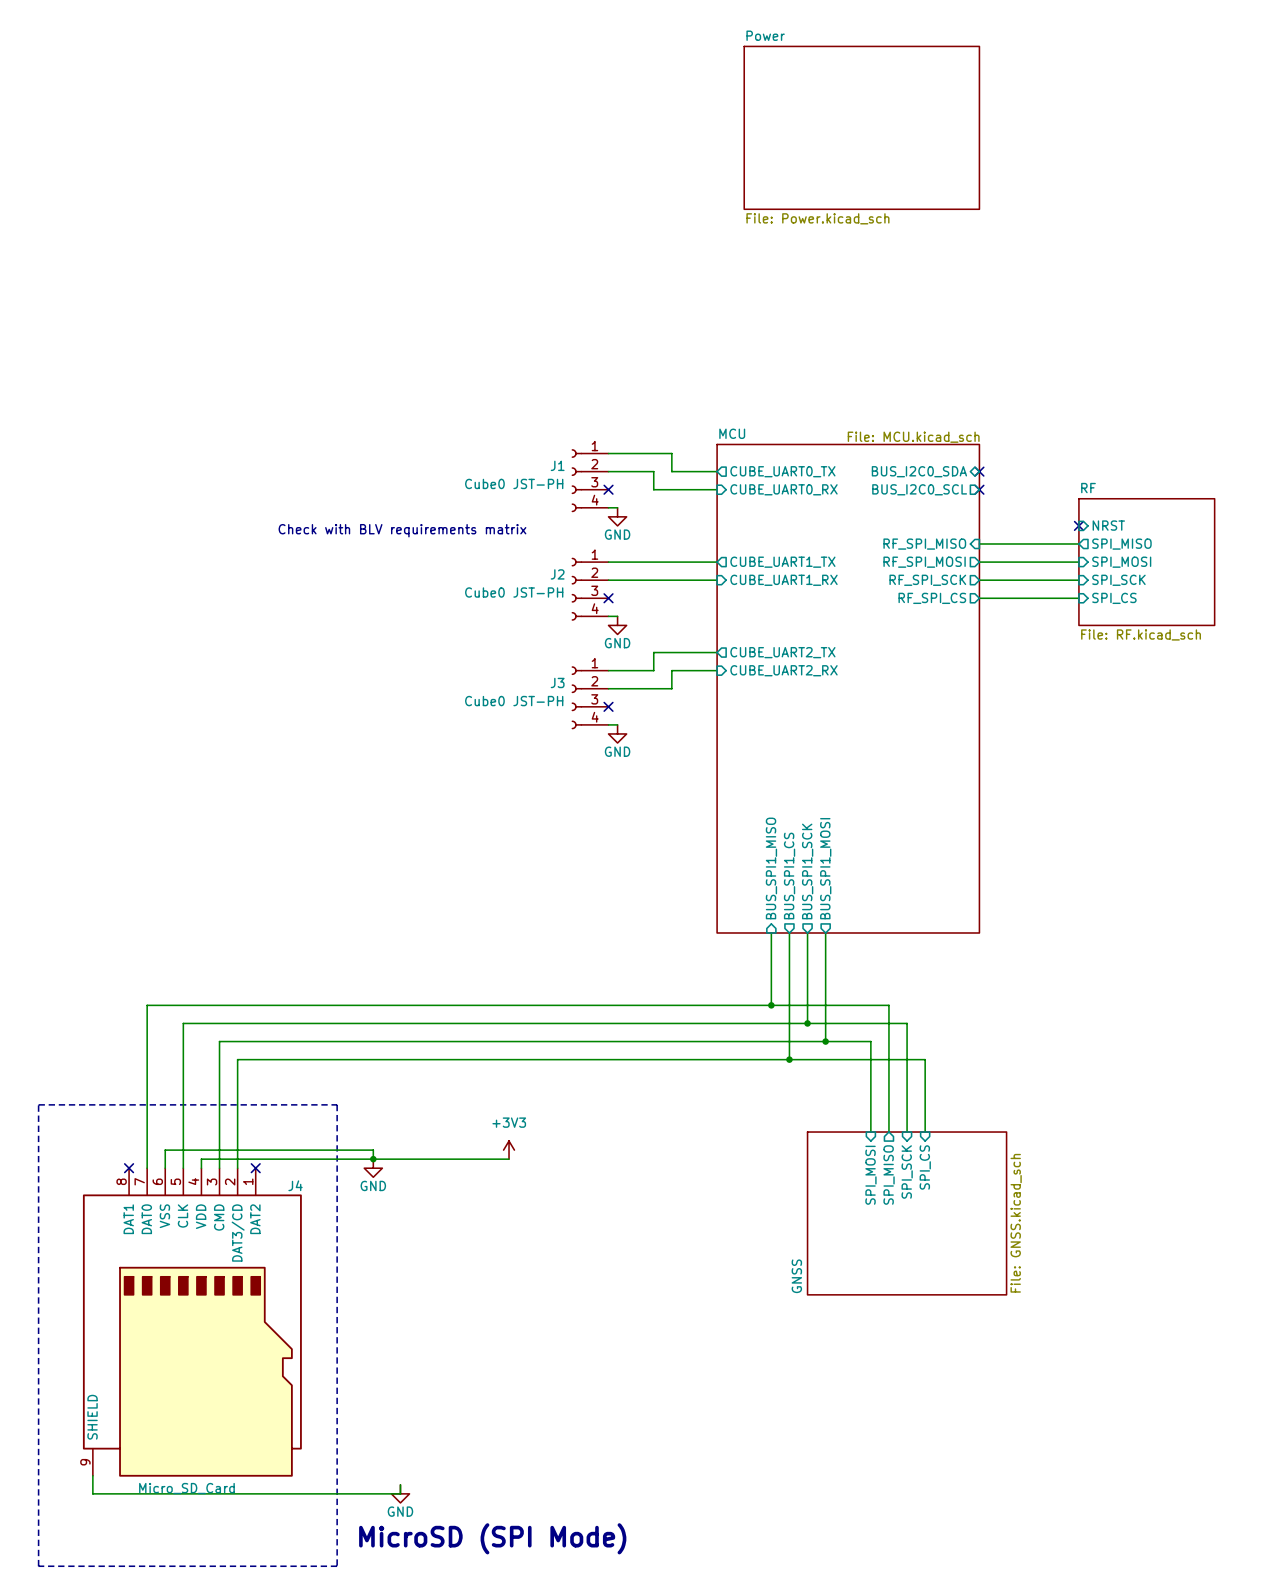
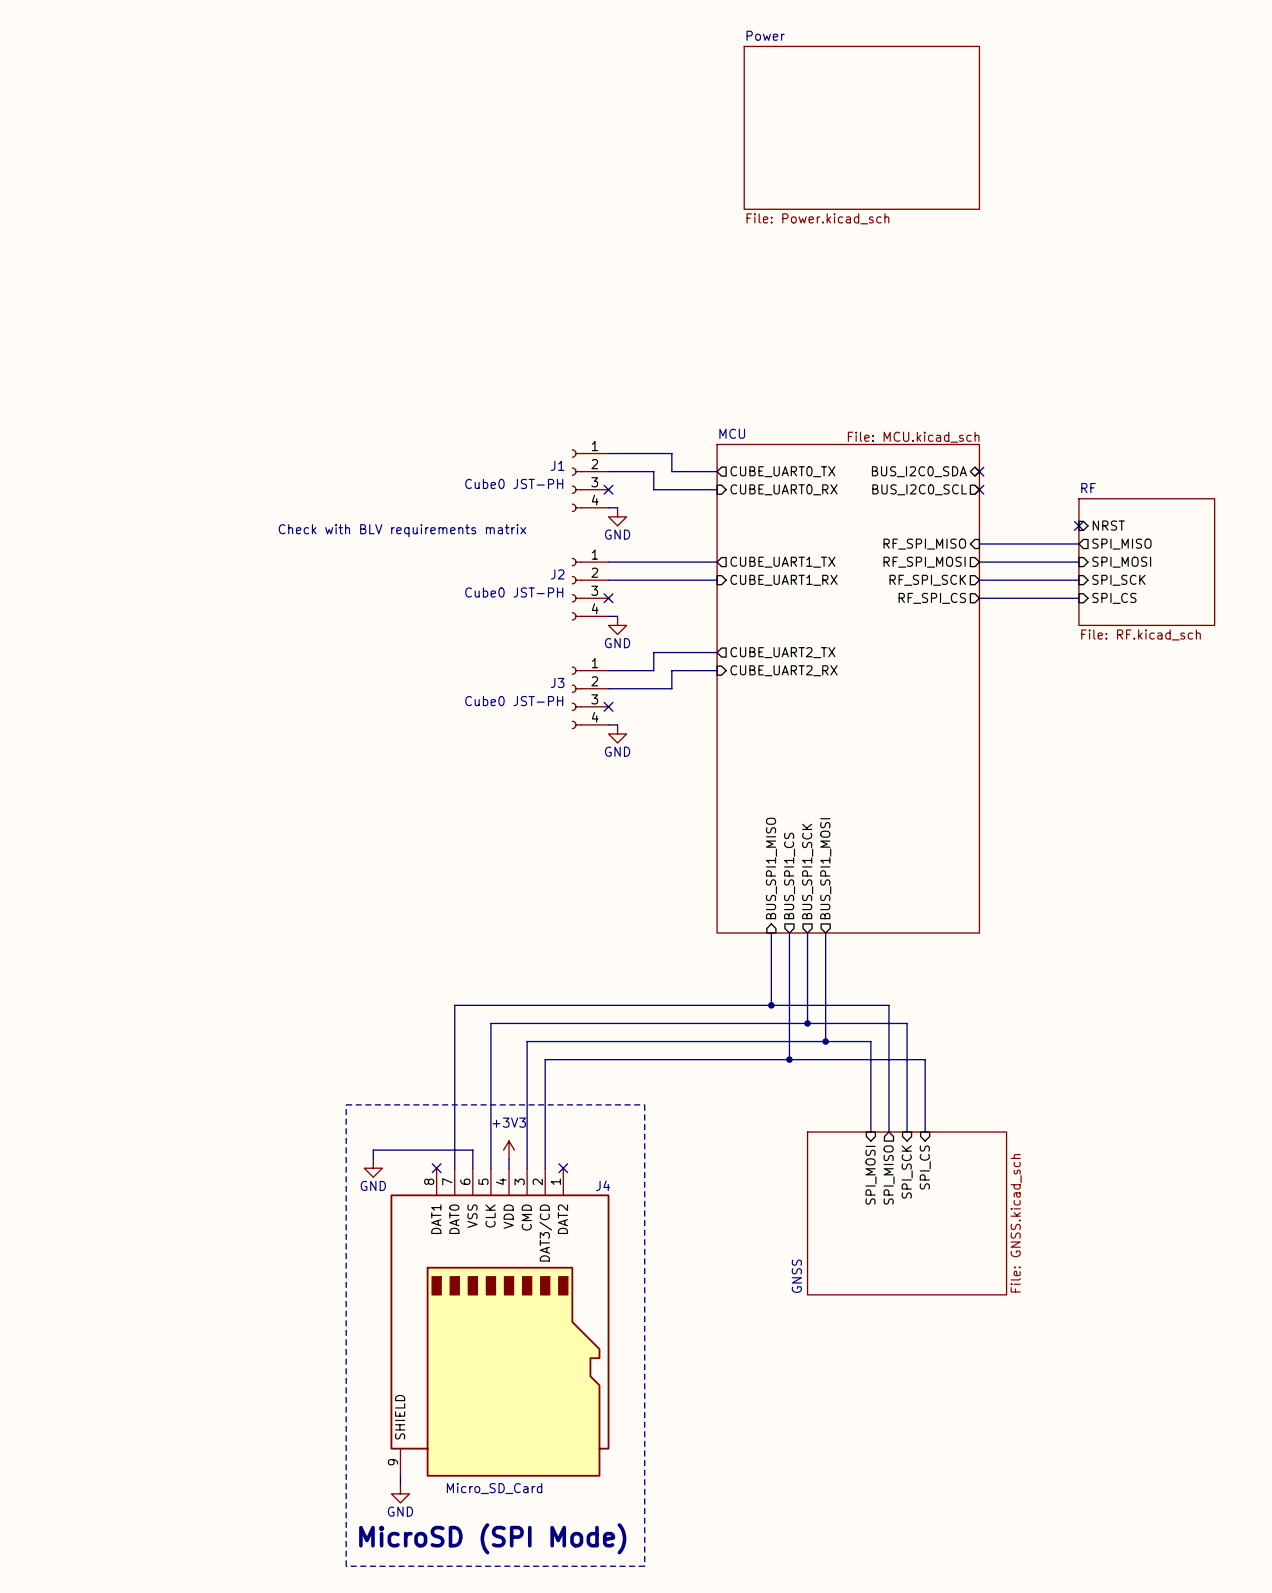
wire: (454, 1005) (147, 1005) (147, 1168) -> (454, 1005) (454, 1168)
wire: (490, 1023) (183, 1023) (183, 1168) -> (490, 1023) (490, 1168)
wire: (527, 1041) (219, 1041) (219, 1168) -> (527, 1041) (527, 1168)
wire: (545, 1059) (237, 1059) (237, 1168) -> (545, 1059) (545, 1168)
line: (38, 1104) (337, 1104) (337, 1566) (38, 1566) (38, 1104) -> none
line: none -> (346, 1104) (644, 1104) (644, 1566) (346, 1566) (346, 1104)
wire: (373, 1150) (165, 1150) (165, 1168) -> (373, 1150) (472, 1150) (472, 1168)
junction: (373, 1159) -> none
wire: (509, 1159) (201, 1159) (201, 1168) -> (509, 1159) (509, 1168)
no-connect mark: (129, 1168) -> none
no-connect mark: (255, 1168) -> none
no-connect mark: none -> (436, 1168)
no-connect mark: none -> (563, 1168)
J4 position: (192, 1322) -> (499, 1322)
wire: (92, 1475) (92, 1493) (400, 1493) (400, 1484) -> (400, 1475) (400, 1484)

